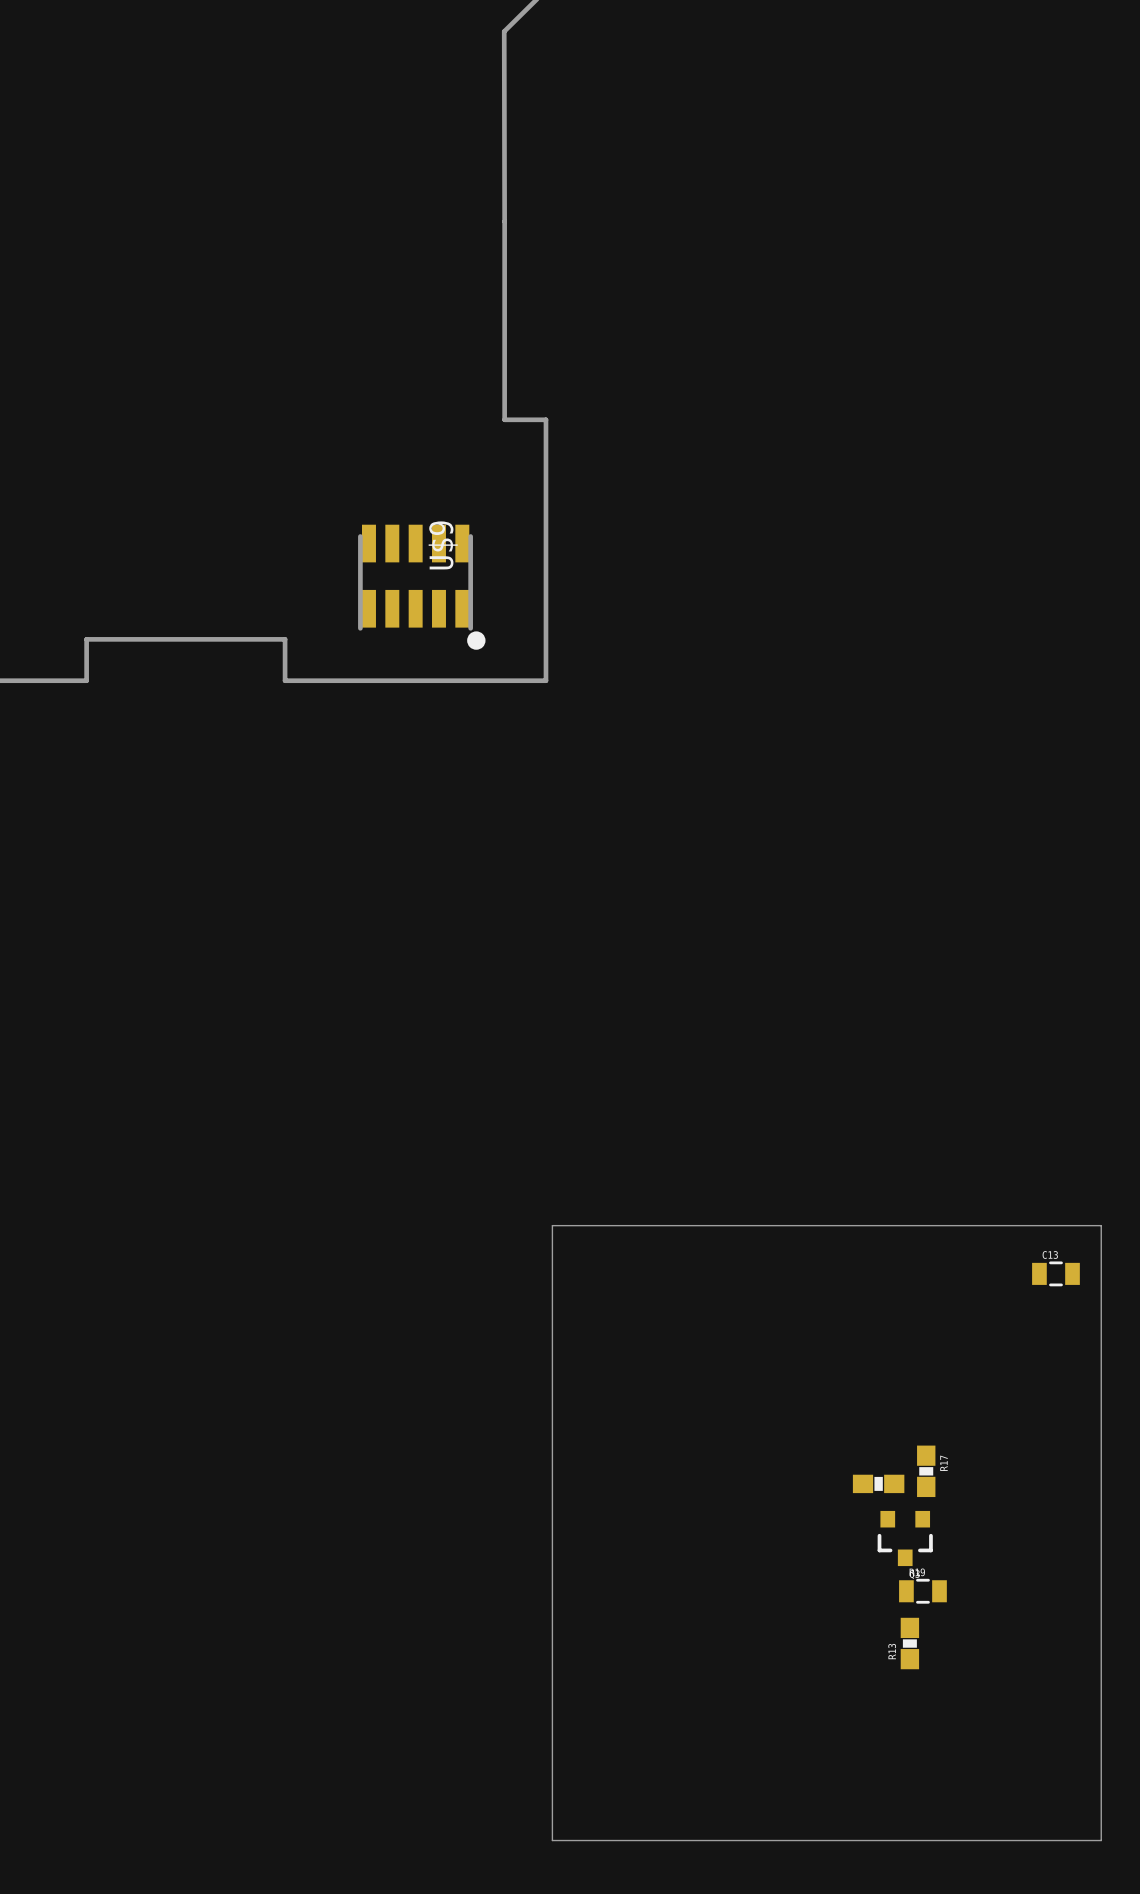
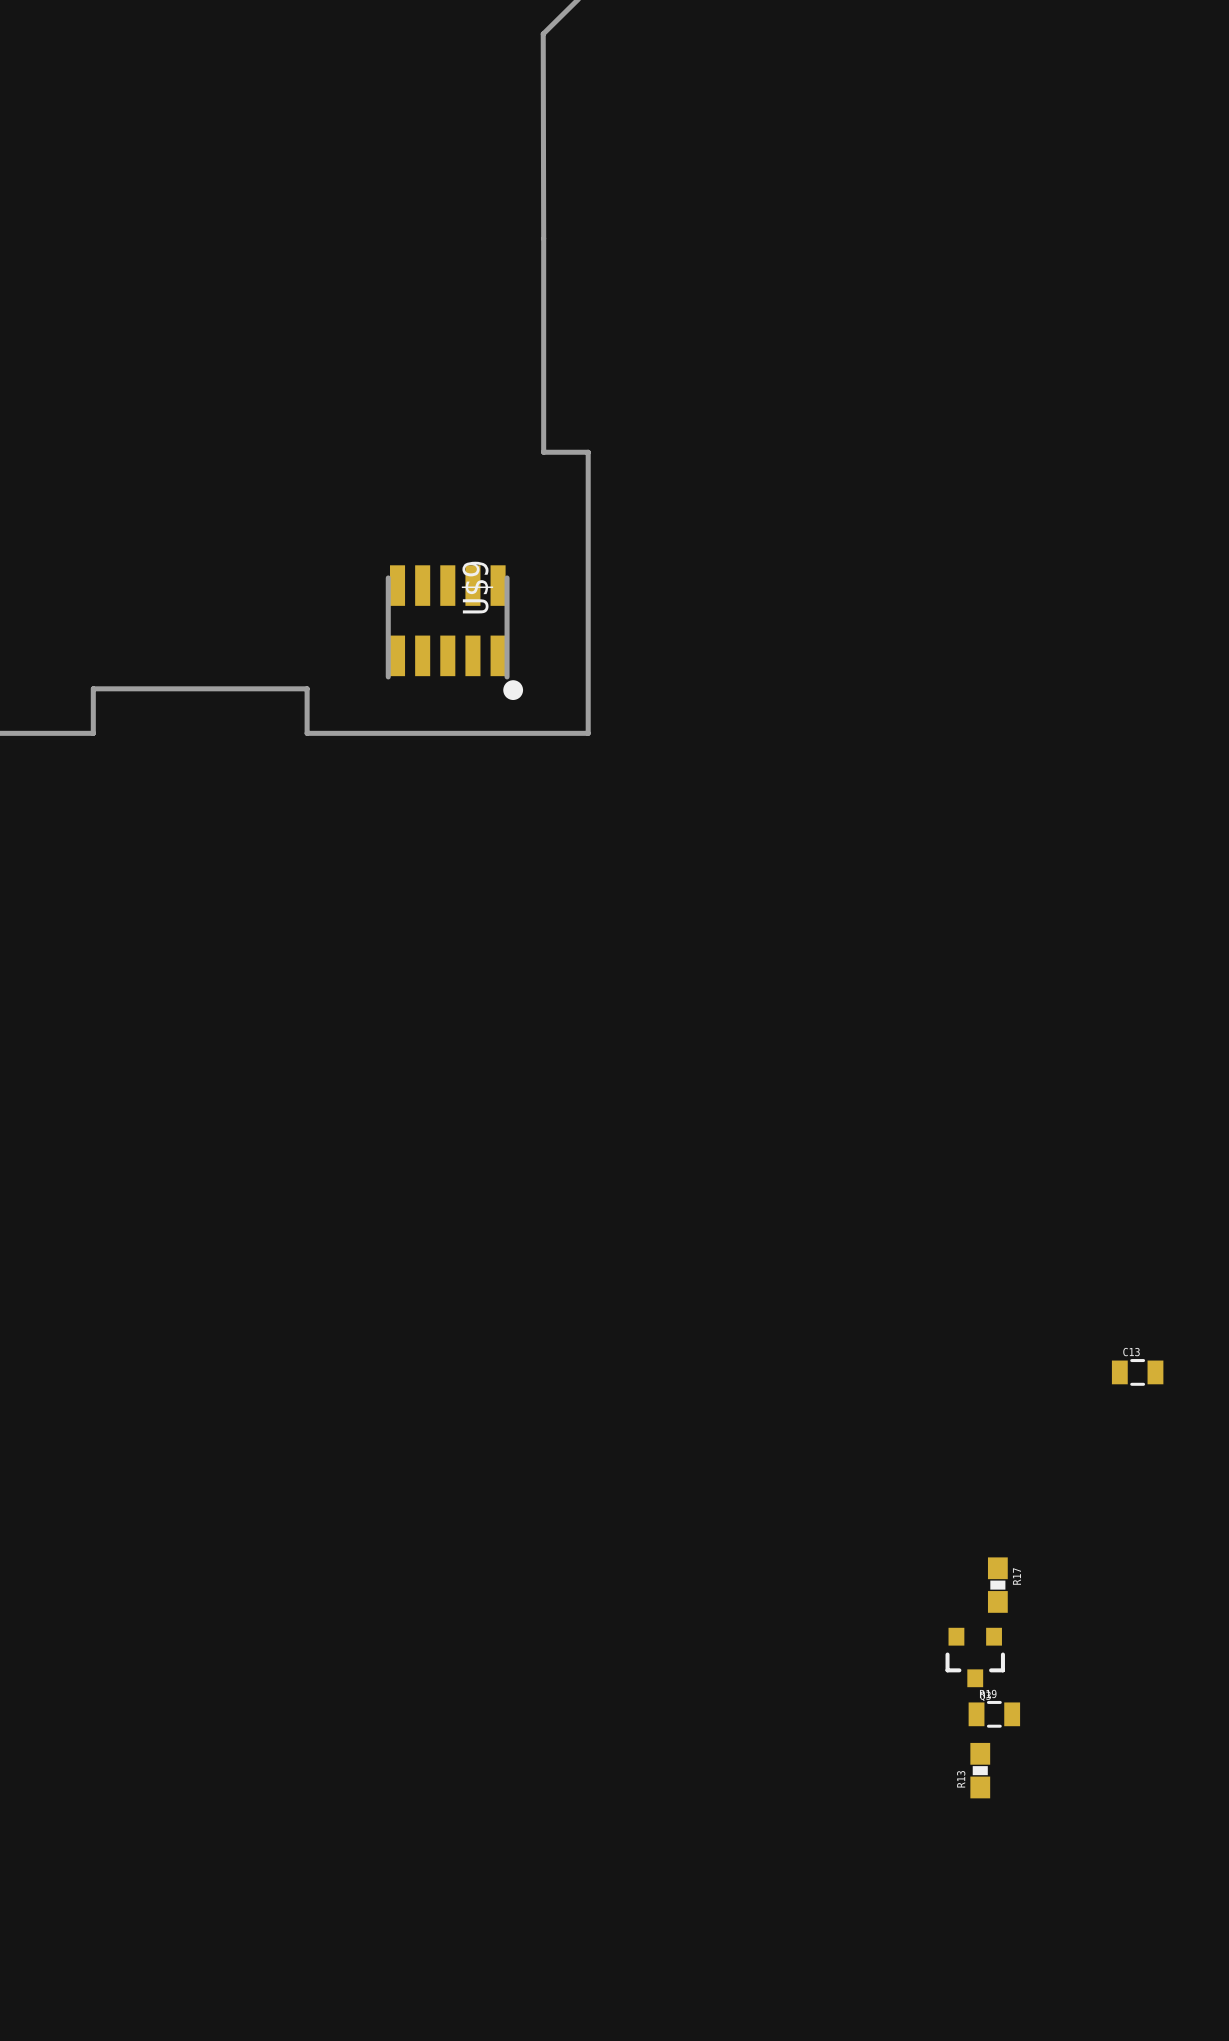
board edge: (552, 1225) (552, 1840) (1101, 1840) (1101, 1225) (552, 1225) -> none
part: (878, 1483) -> none

